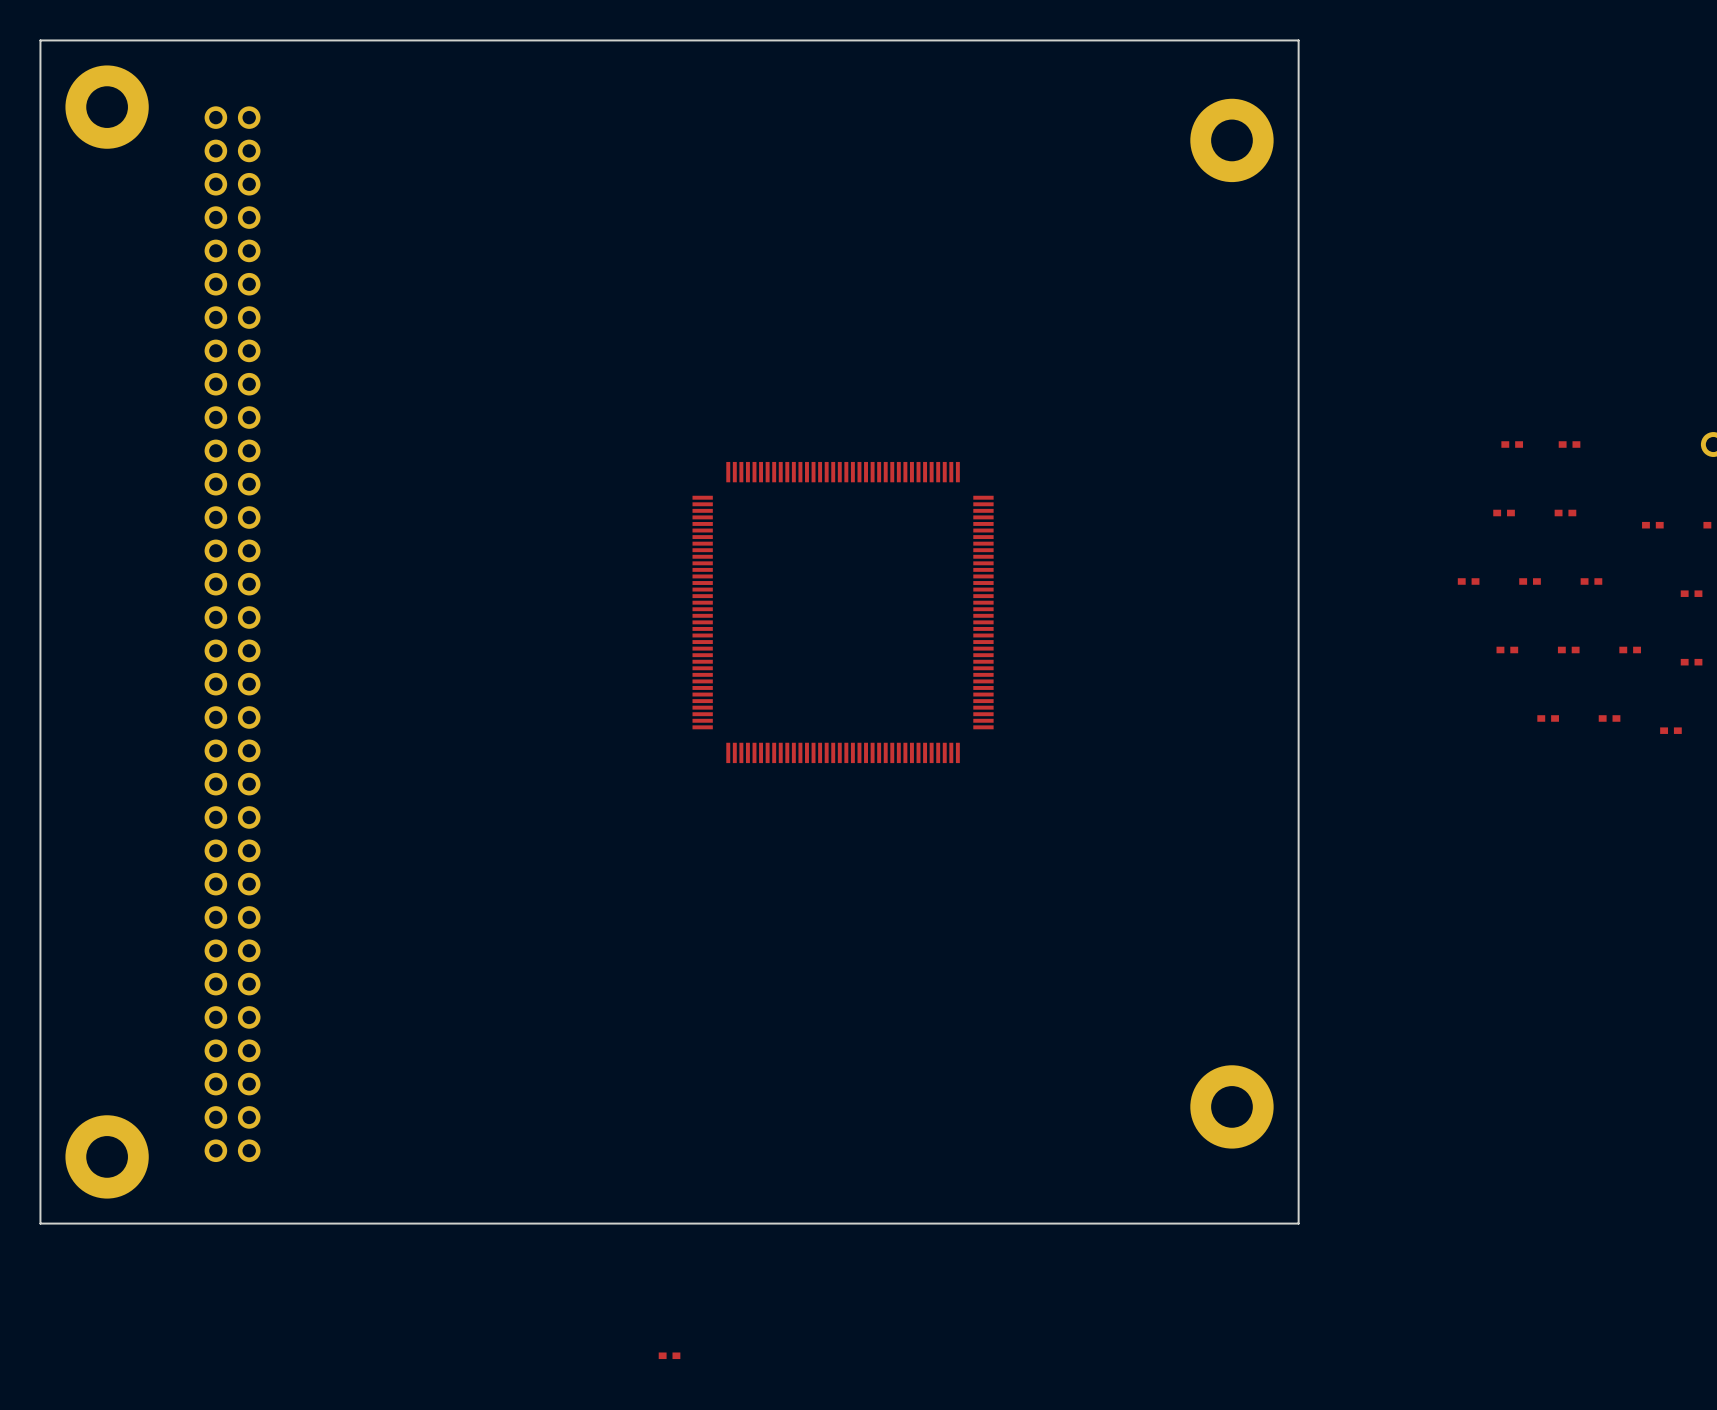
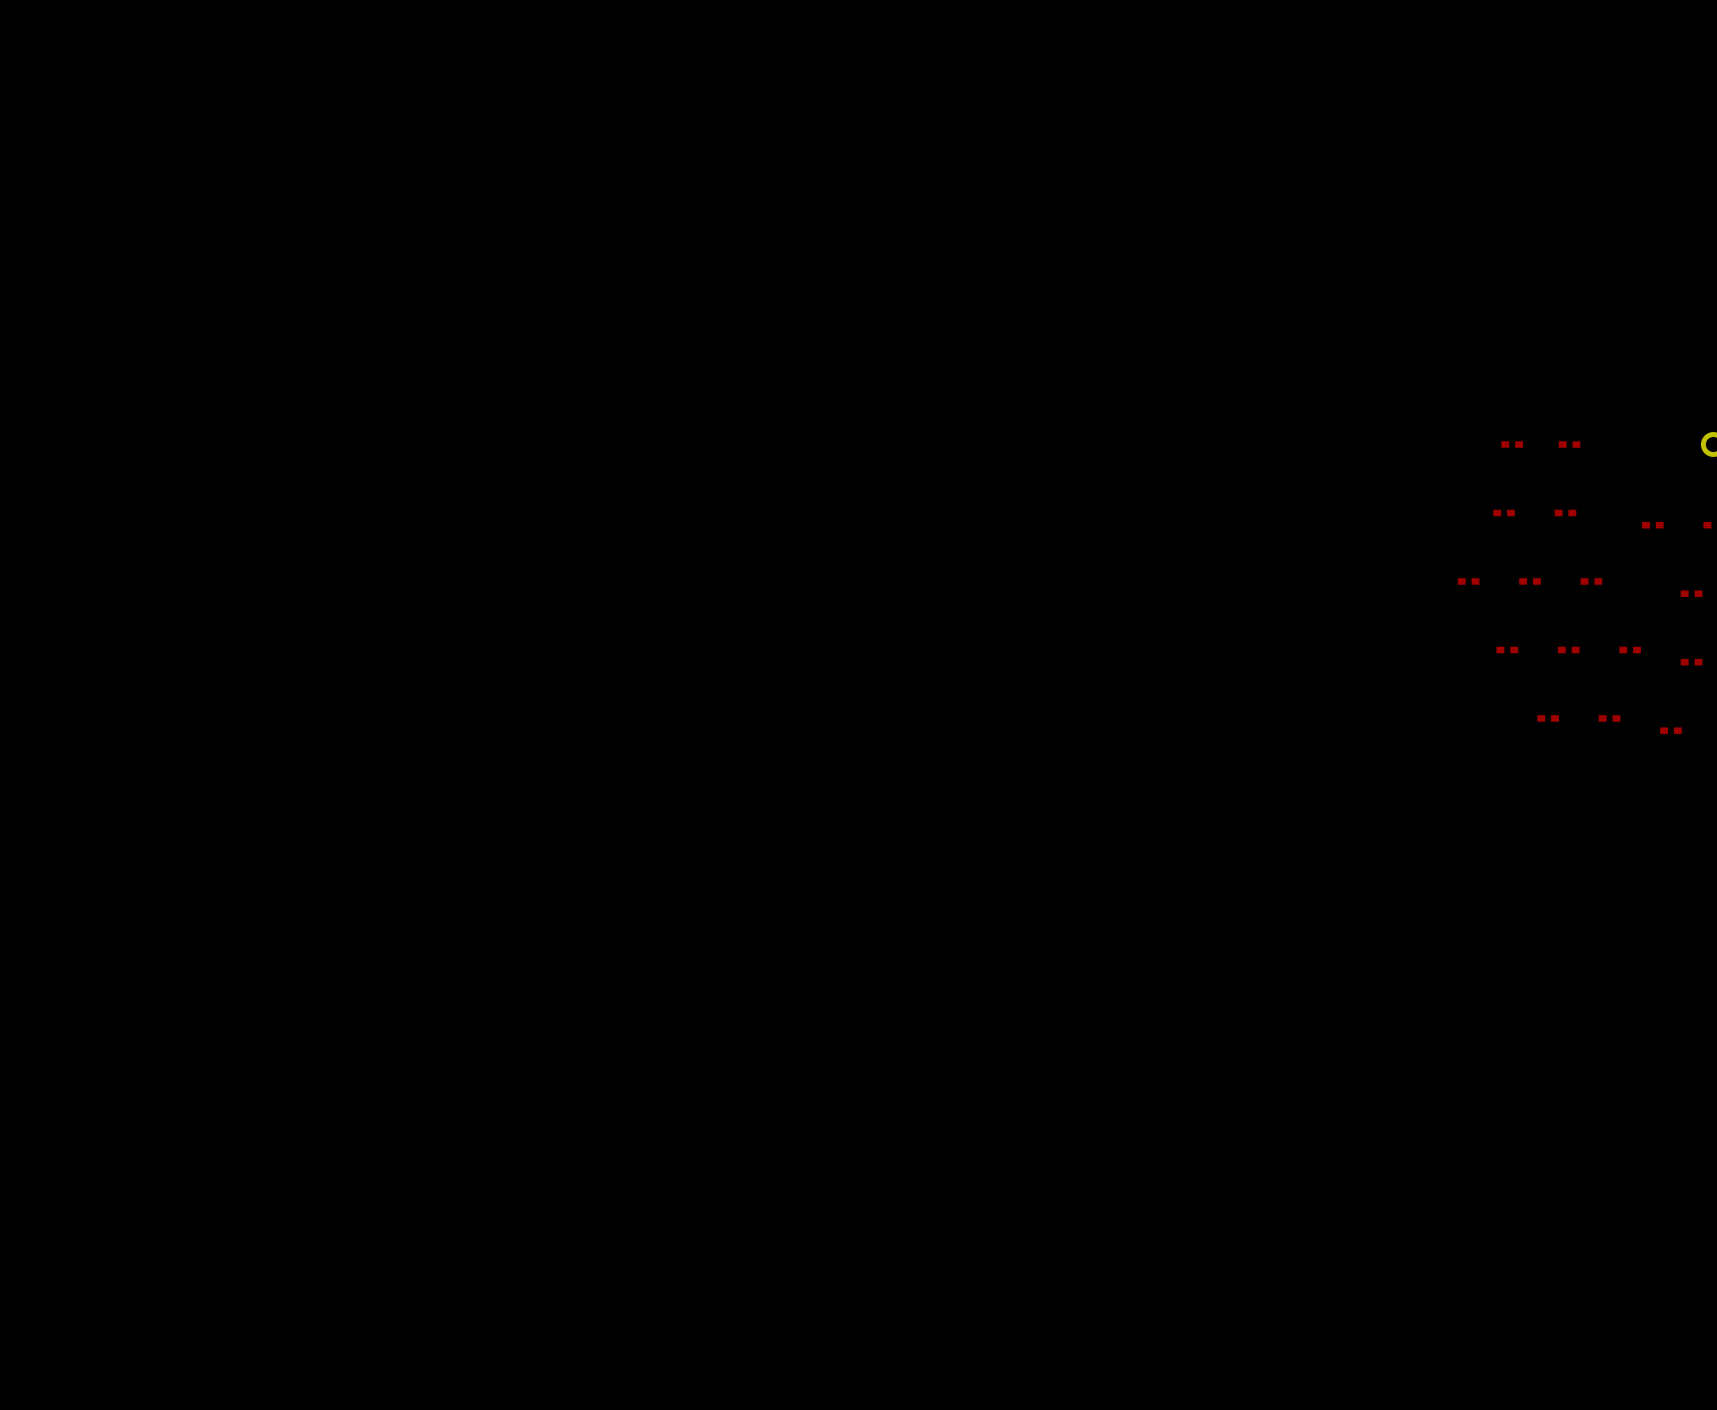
board edge: (1298, 40) (1298, 1223) (40, 1223) (40, 40) (1298, 40) -> none
part: (107, 107) -> none
part: (1231, 140) -> none
part: (843, 612) -> none
part: (232, 634) -> none
part: (1231, 1106) -> none
part: (107, 1156) -> none
part: (669, 1355) -> none

